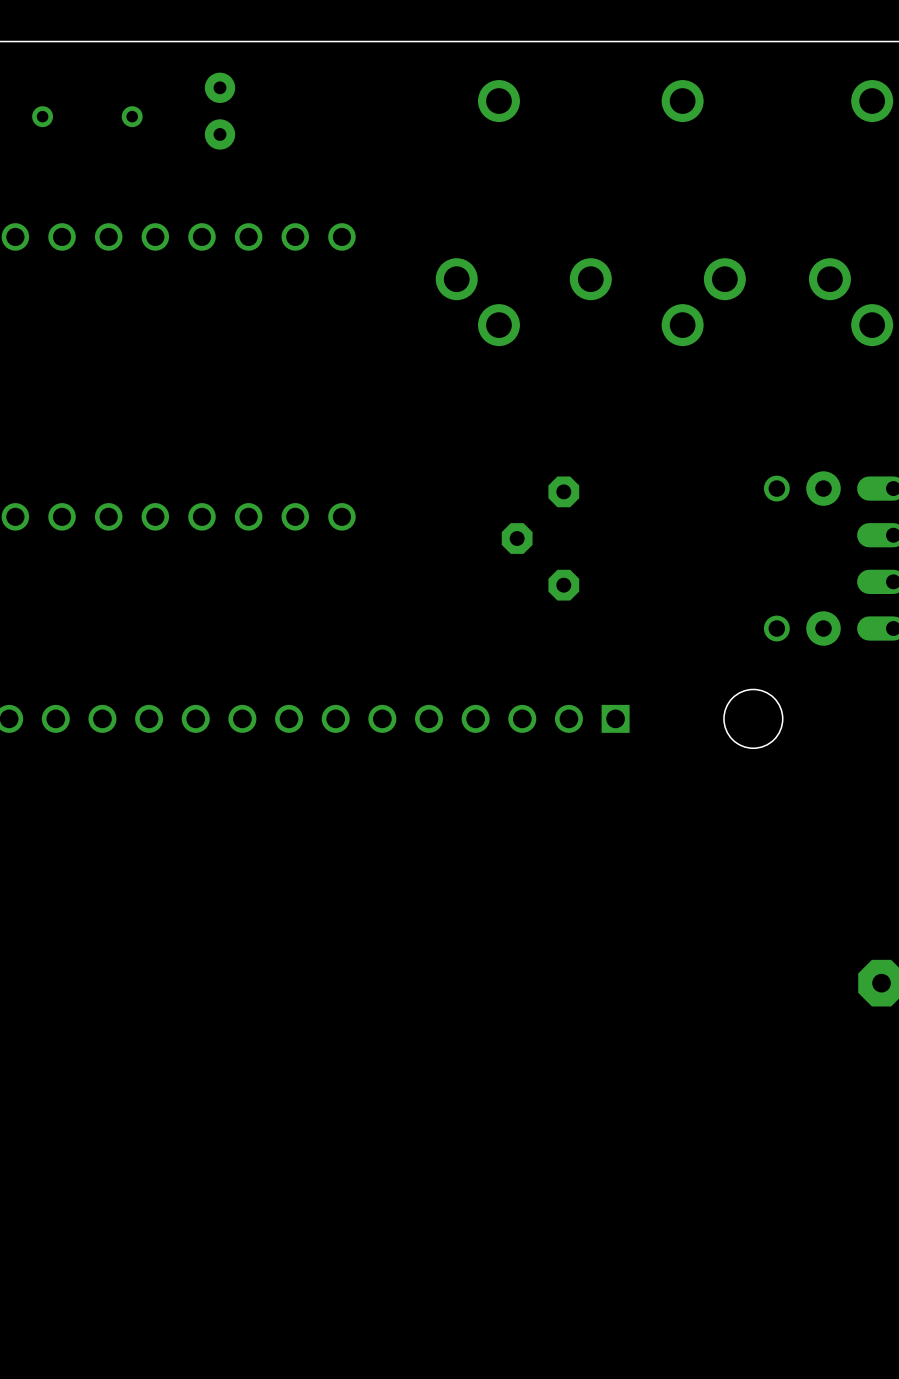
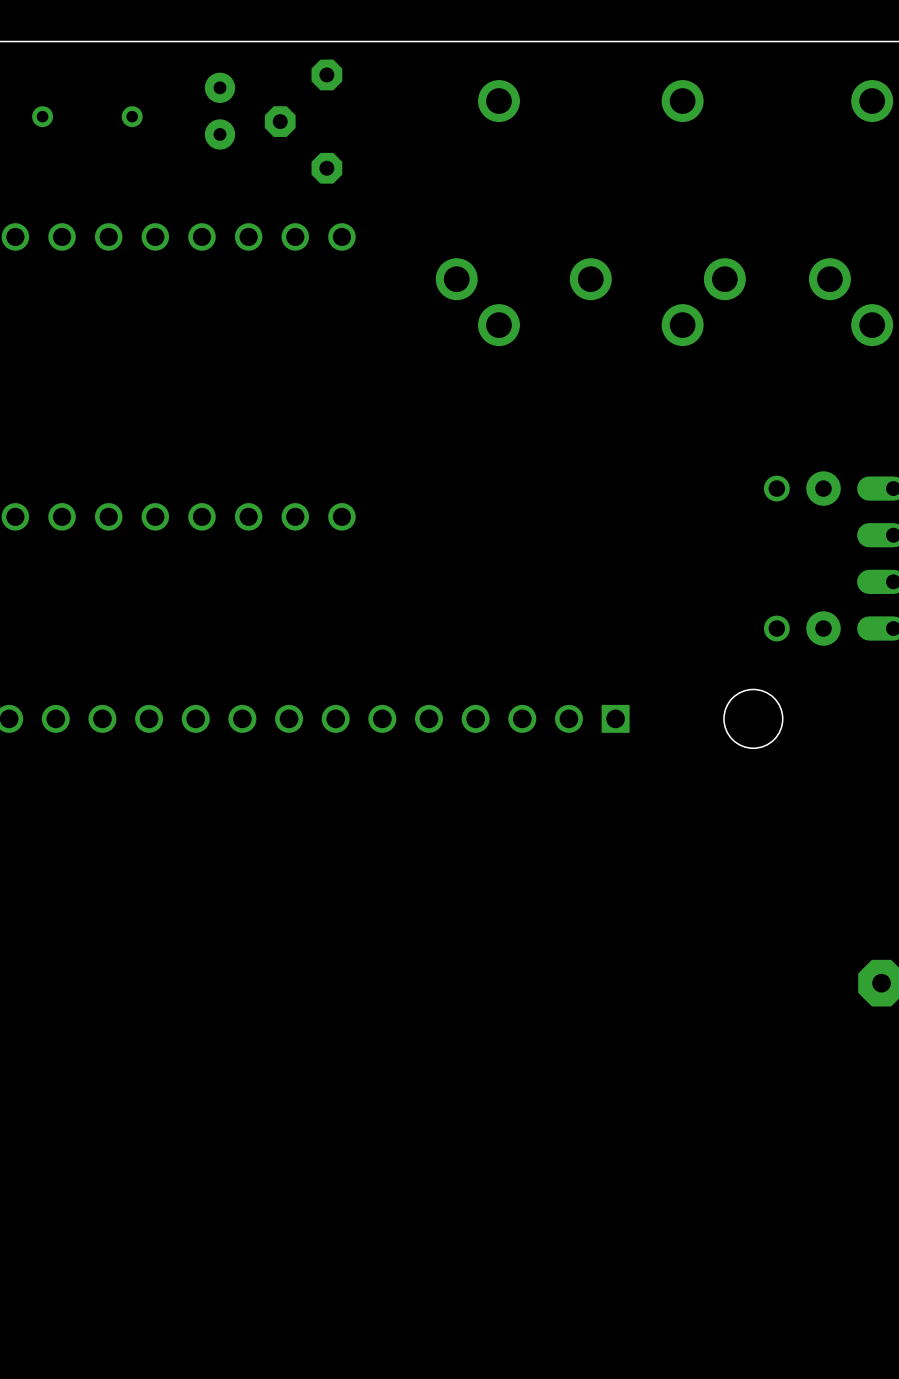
part: none -> (303, 121)
part: (540, 538) -> none

